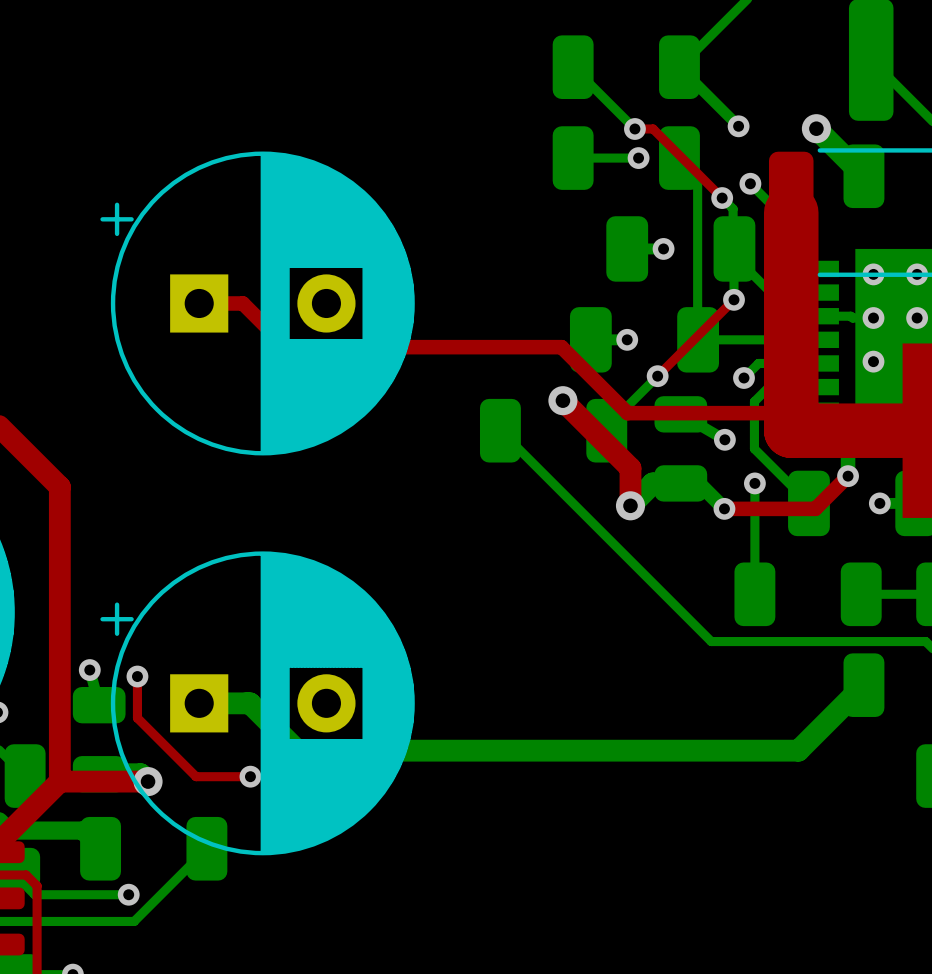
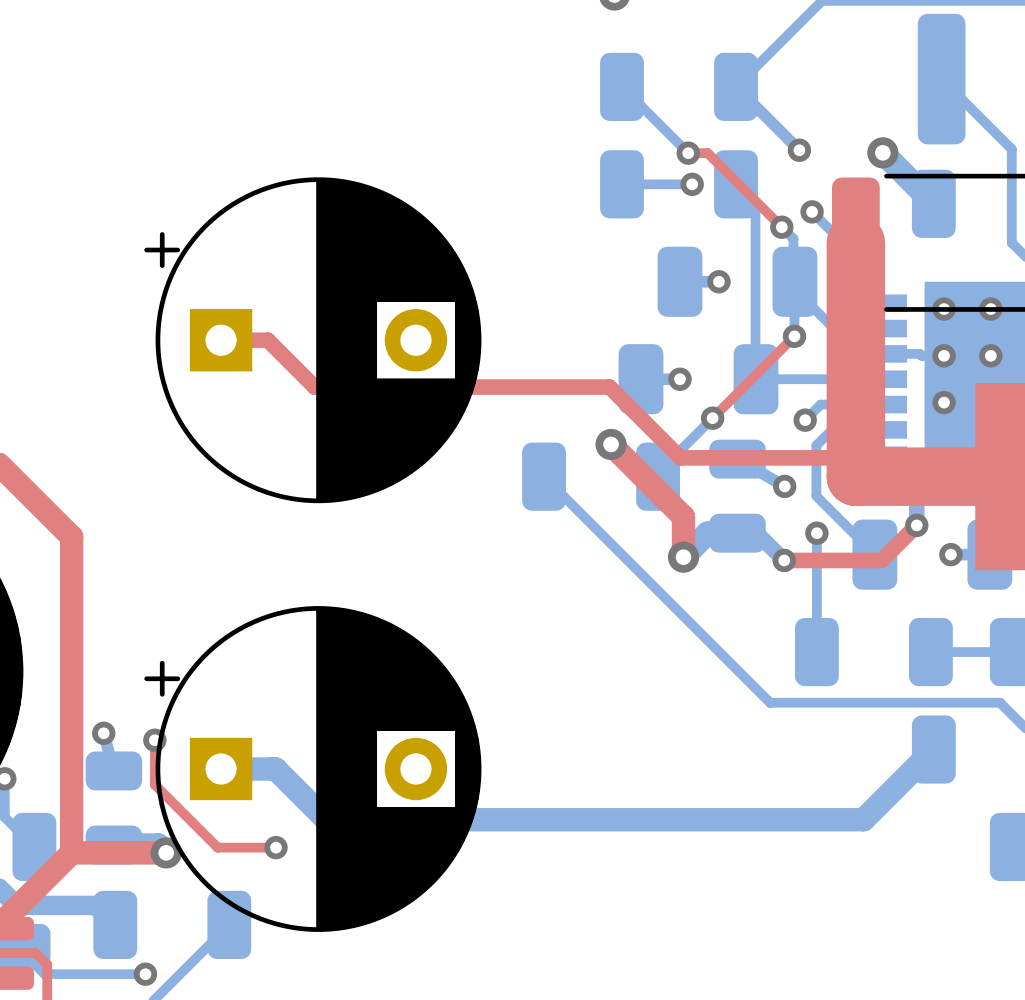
part footprint: [100, 151, 415, 456] -> [144, 177, 482, 504]
part footprint: [100, 551, 415, 856] -> [144, 606, 482, 932]

